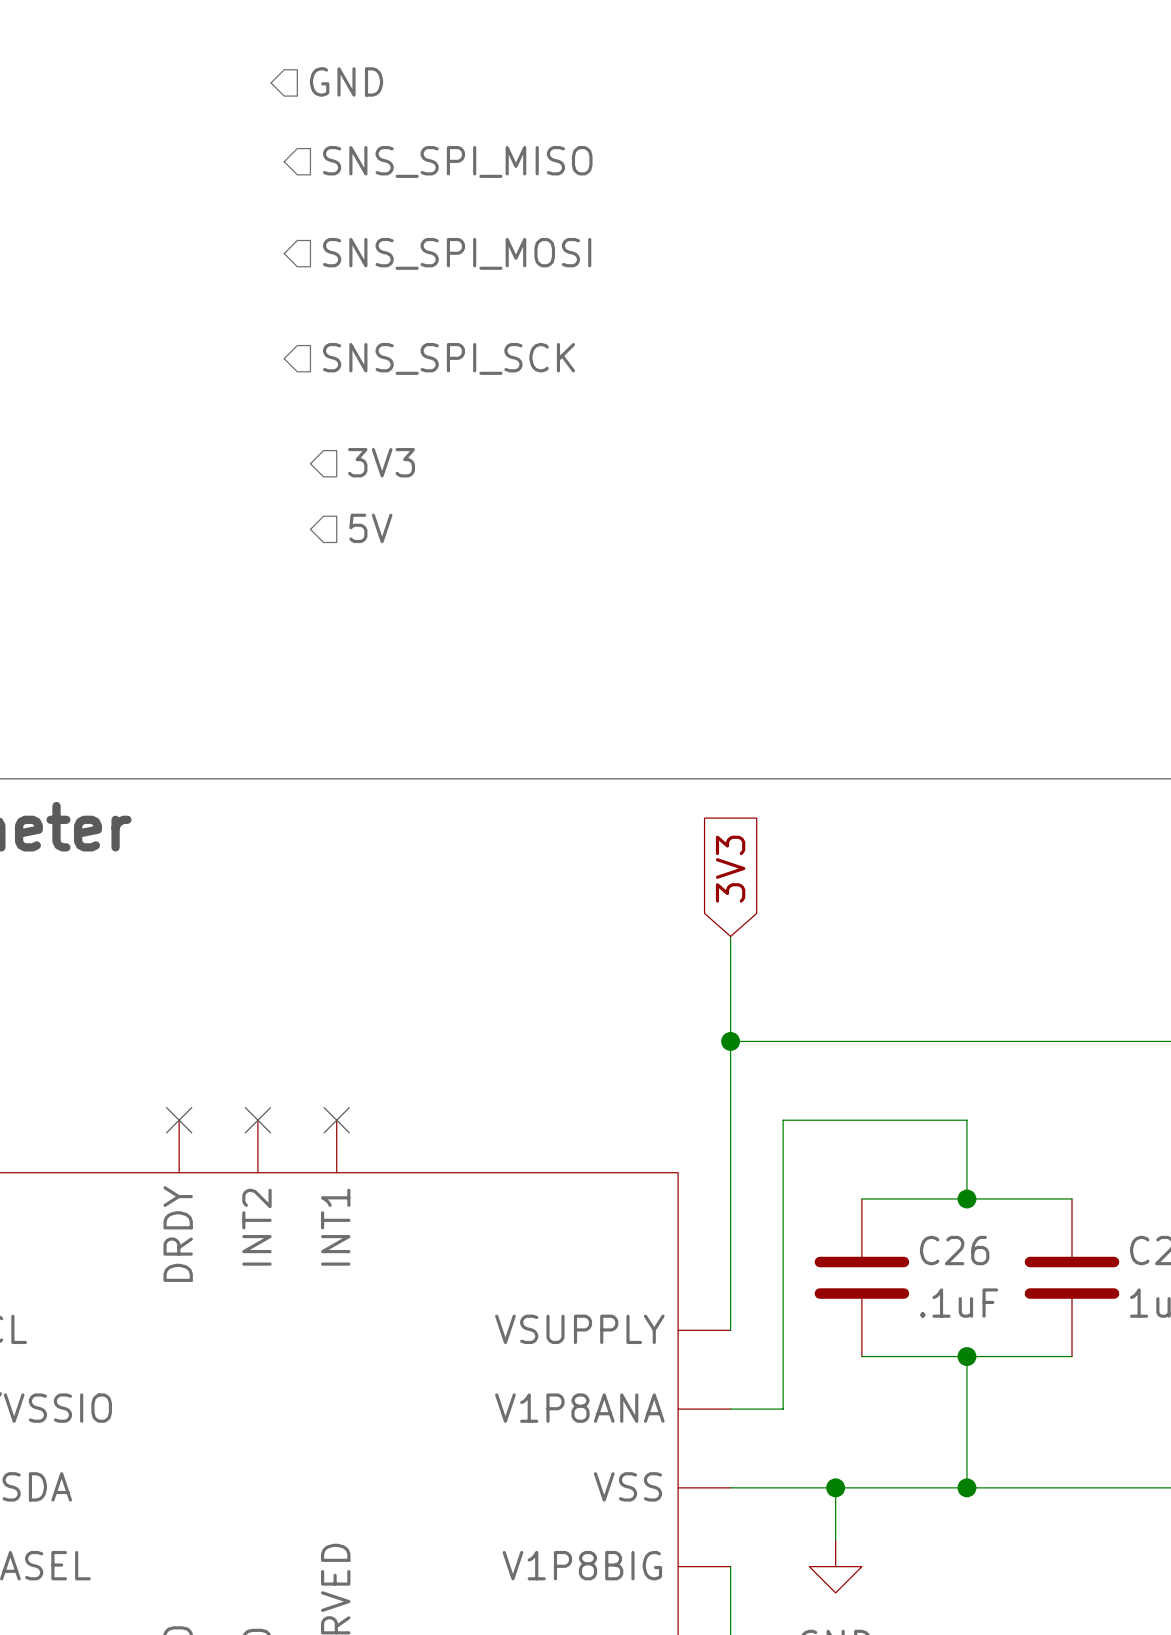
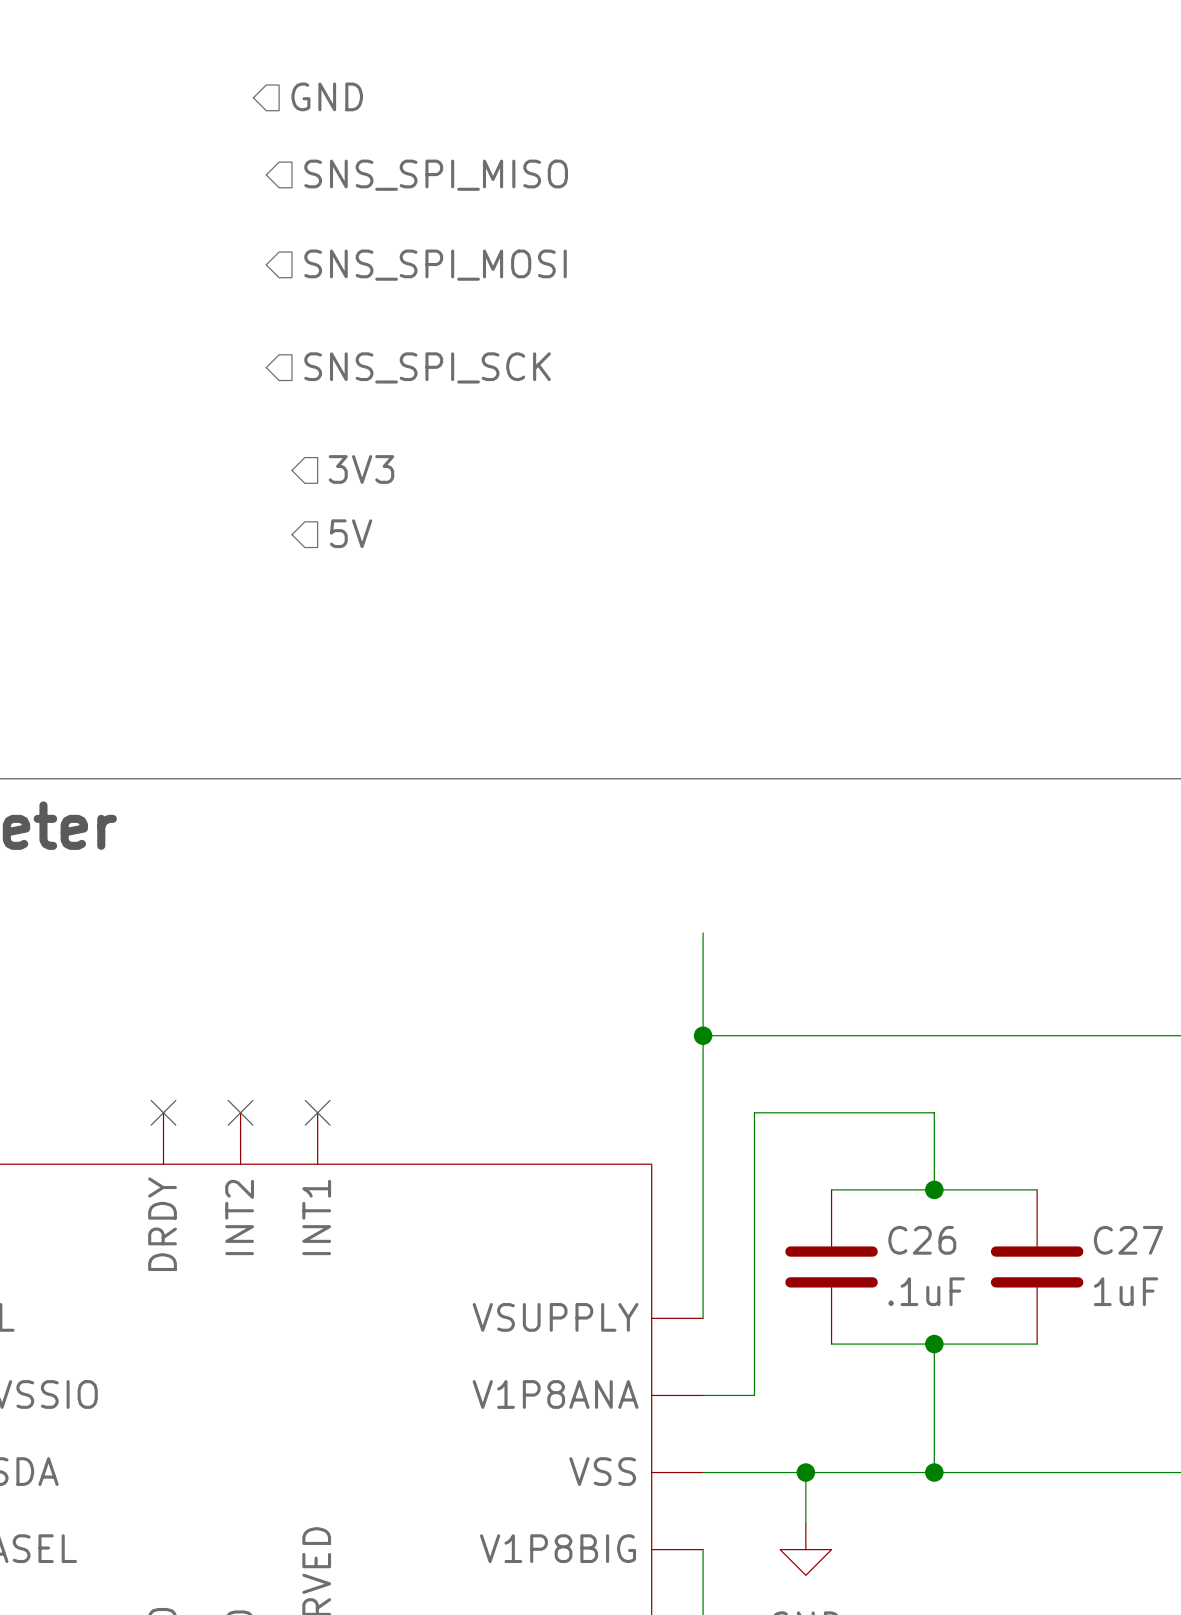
global label: 3V3 (730, 869) -> none

